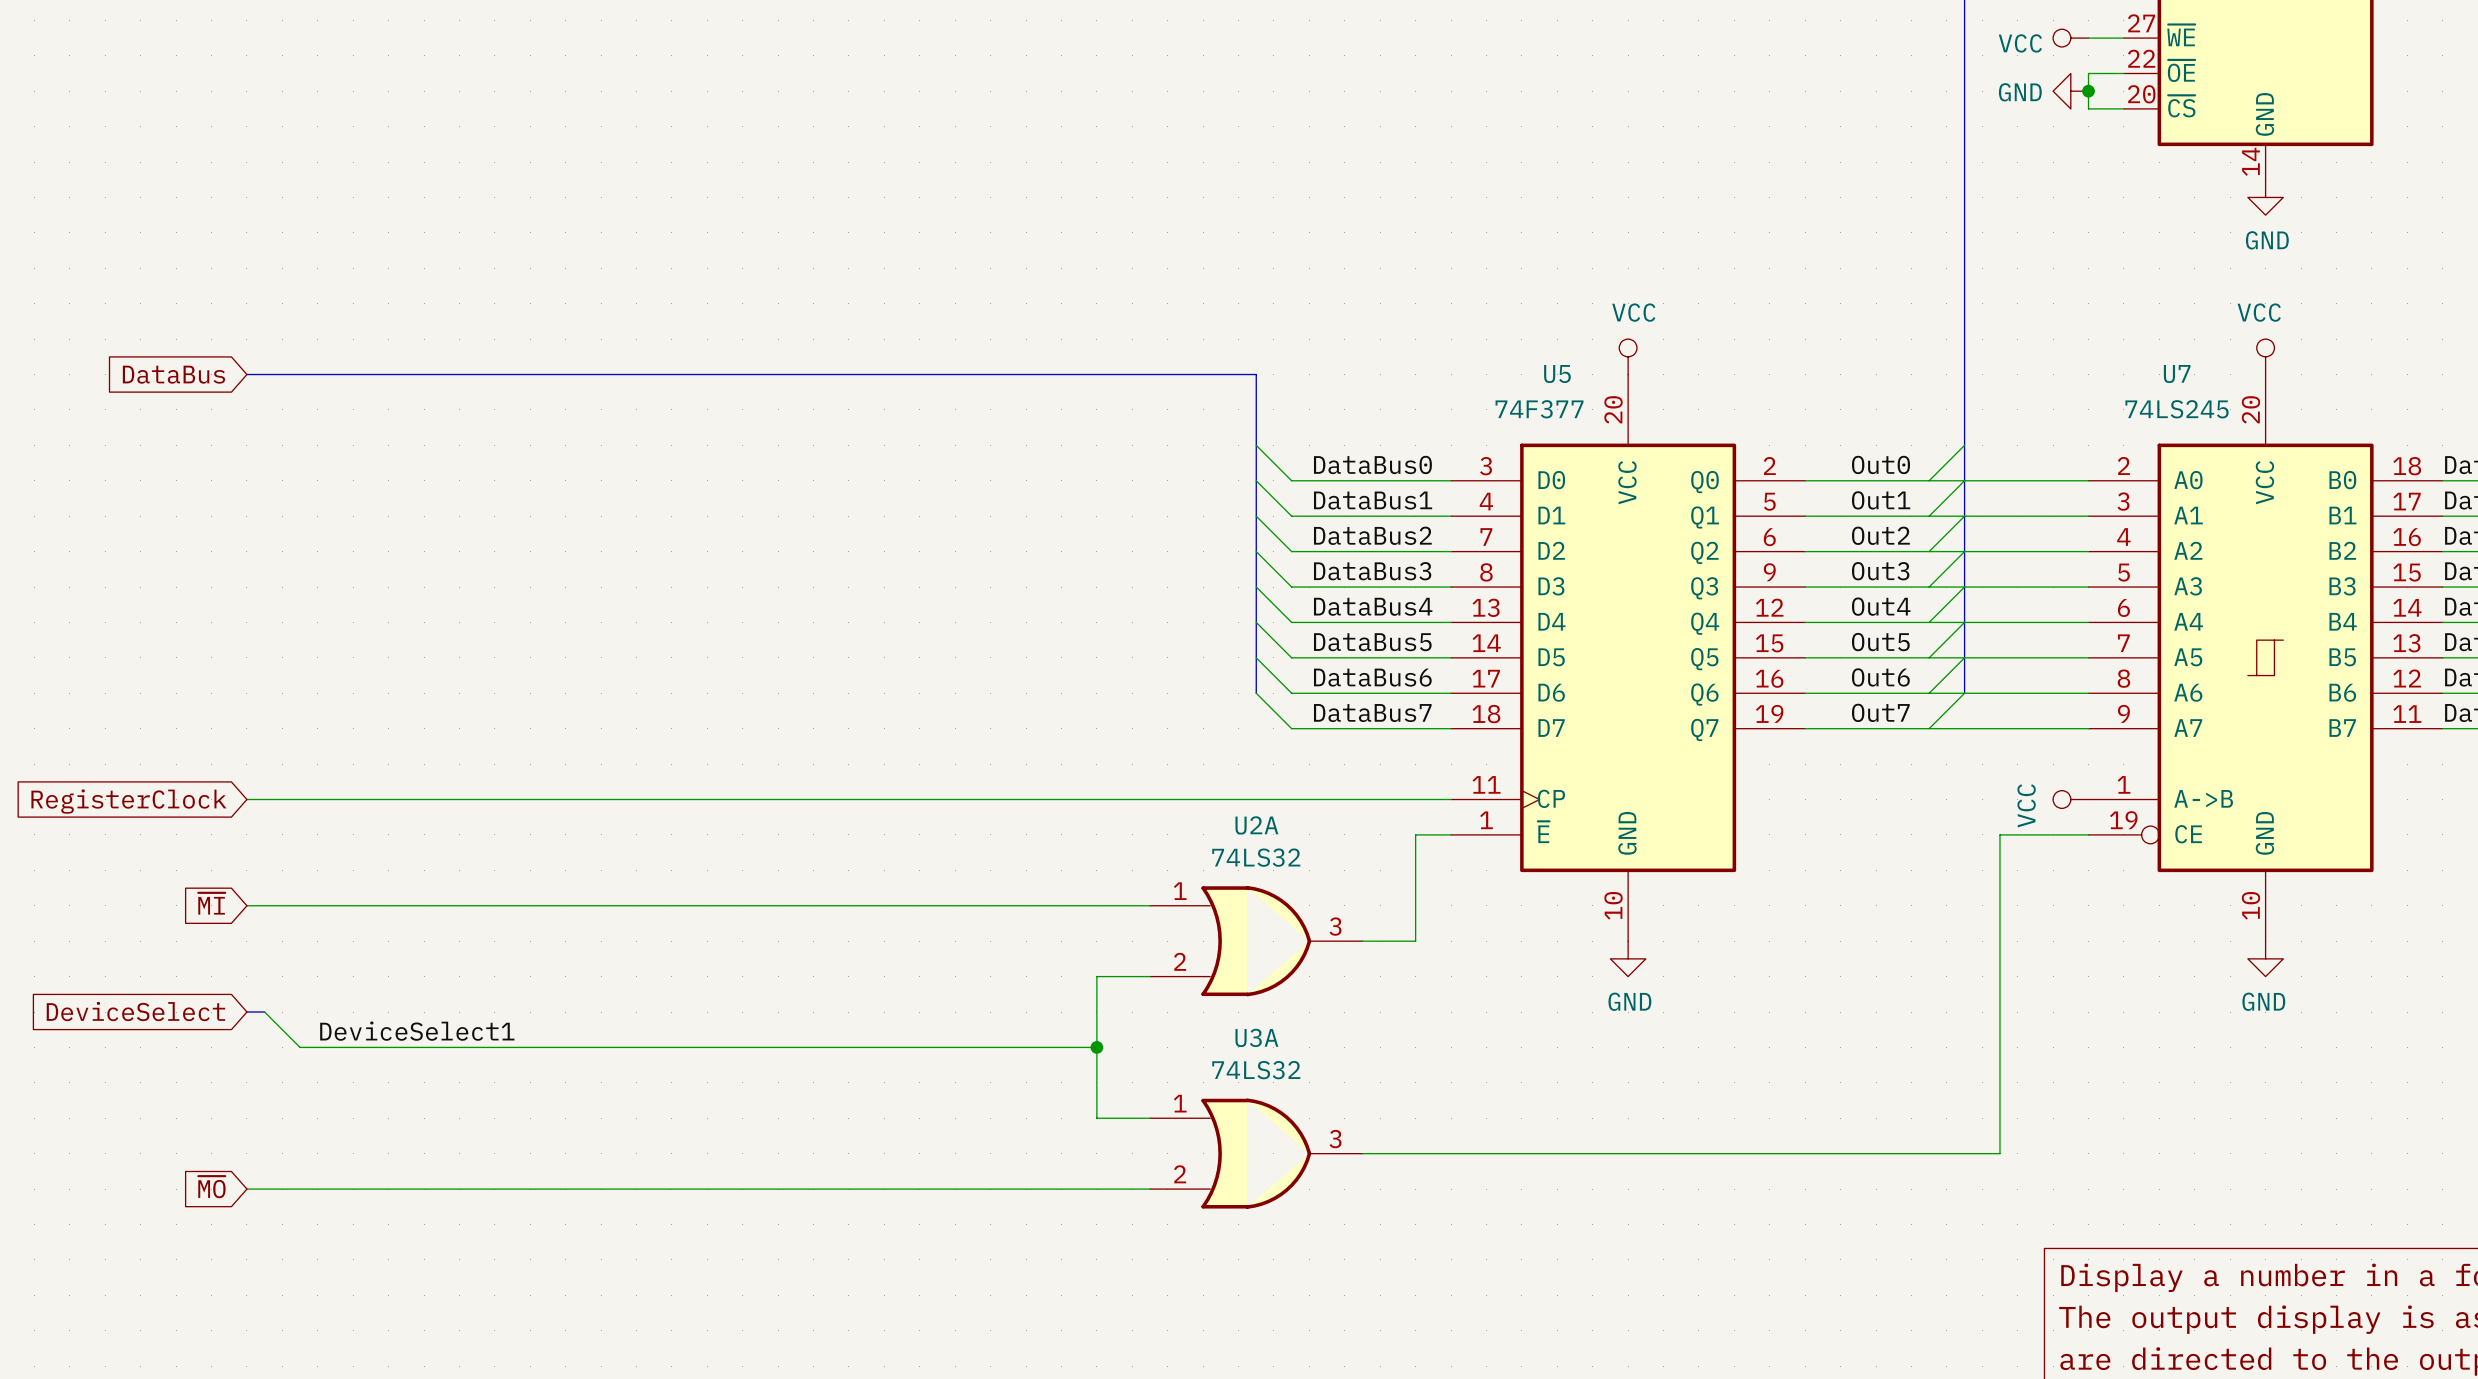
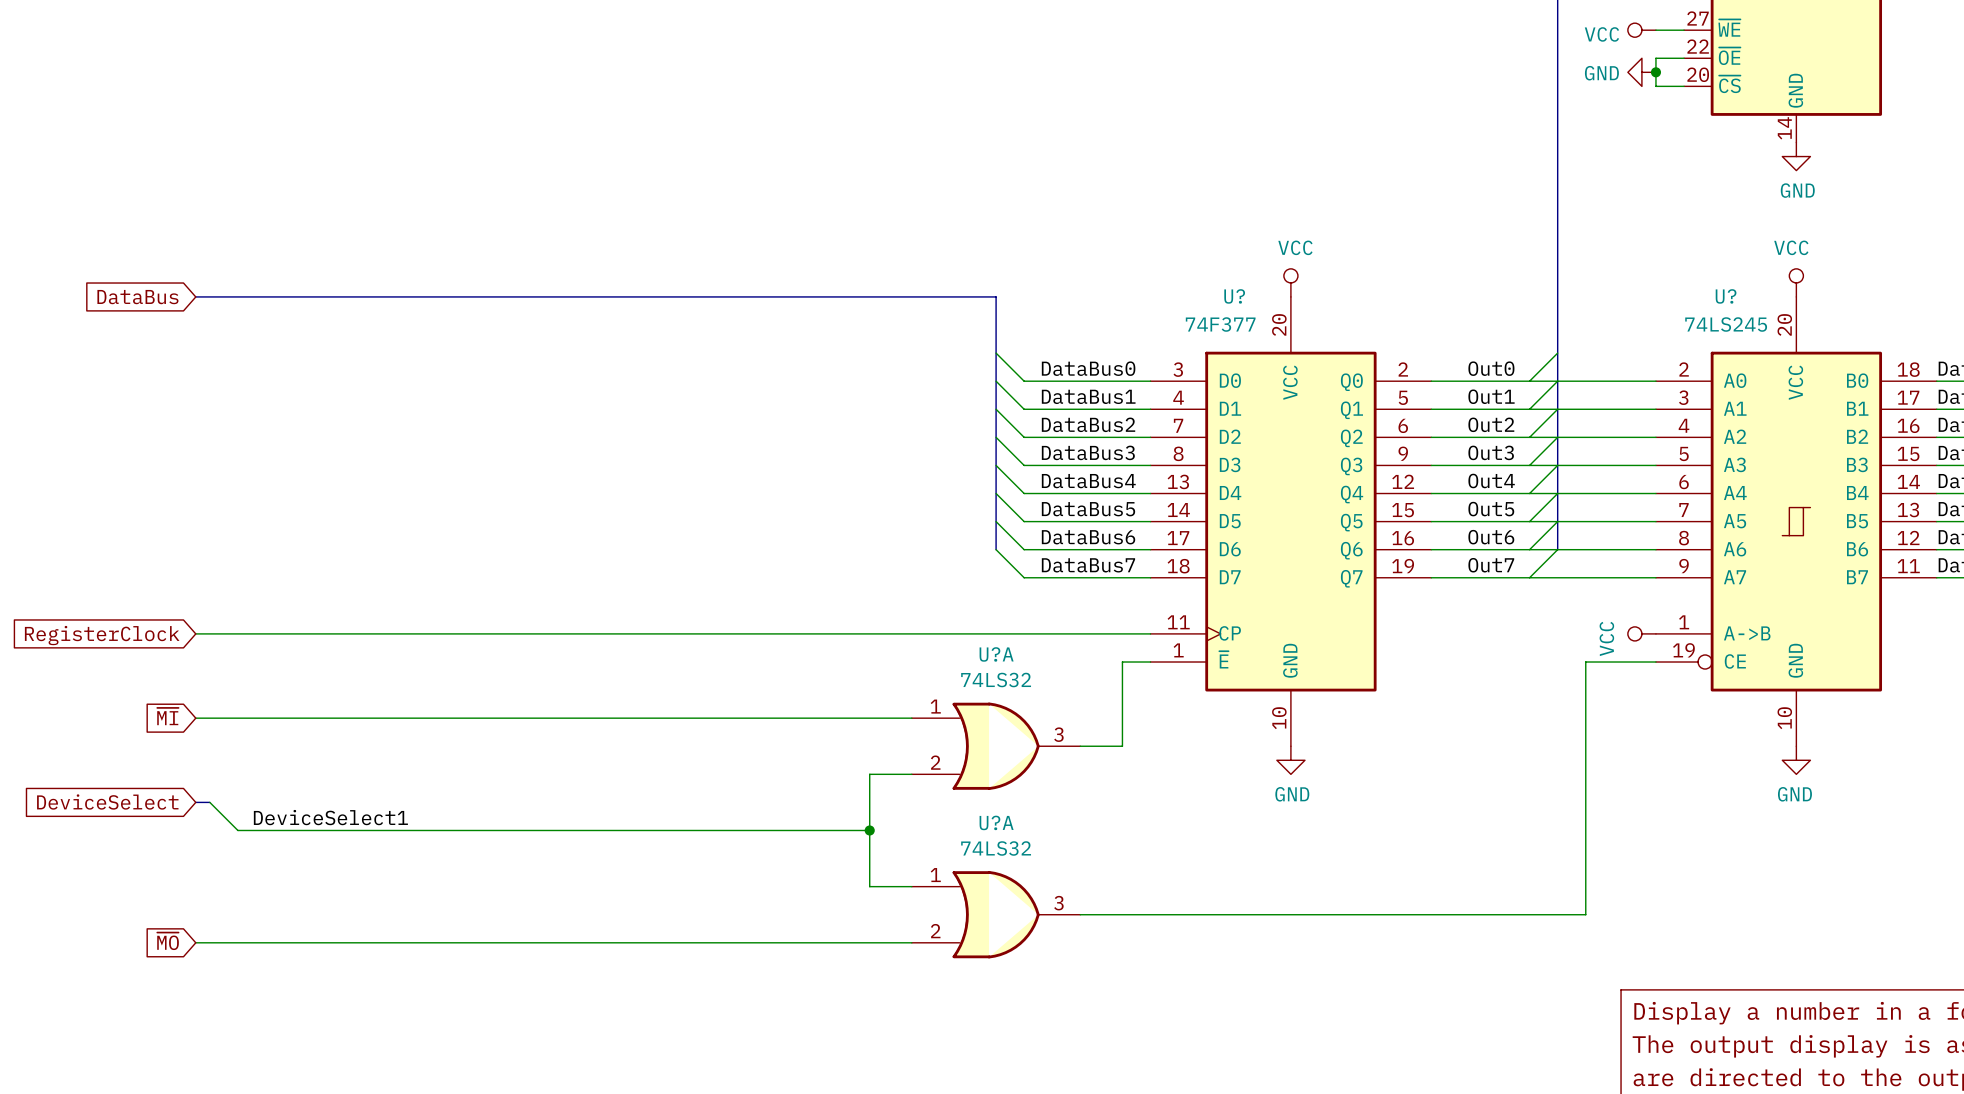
U5 name: U5 (1557, 374) -> U? (1234, 296)
U7 name: U7 (2177, 374) -> U? (1726, 296)
U2A name: U2A (1256, 825) -> U?A (996, 654)
U3A name: U3A (1256, 1037) -> U?A (996, 822)

